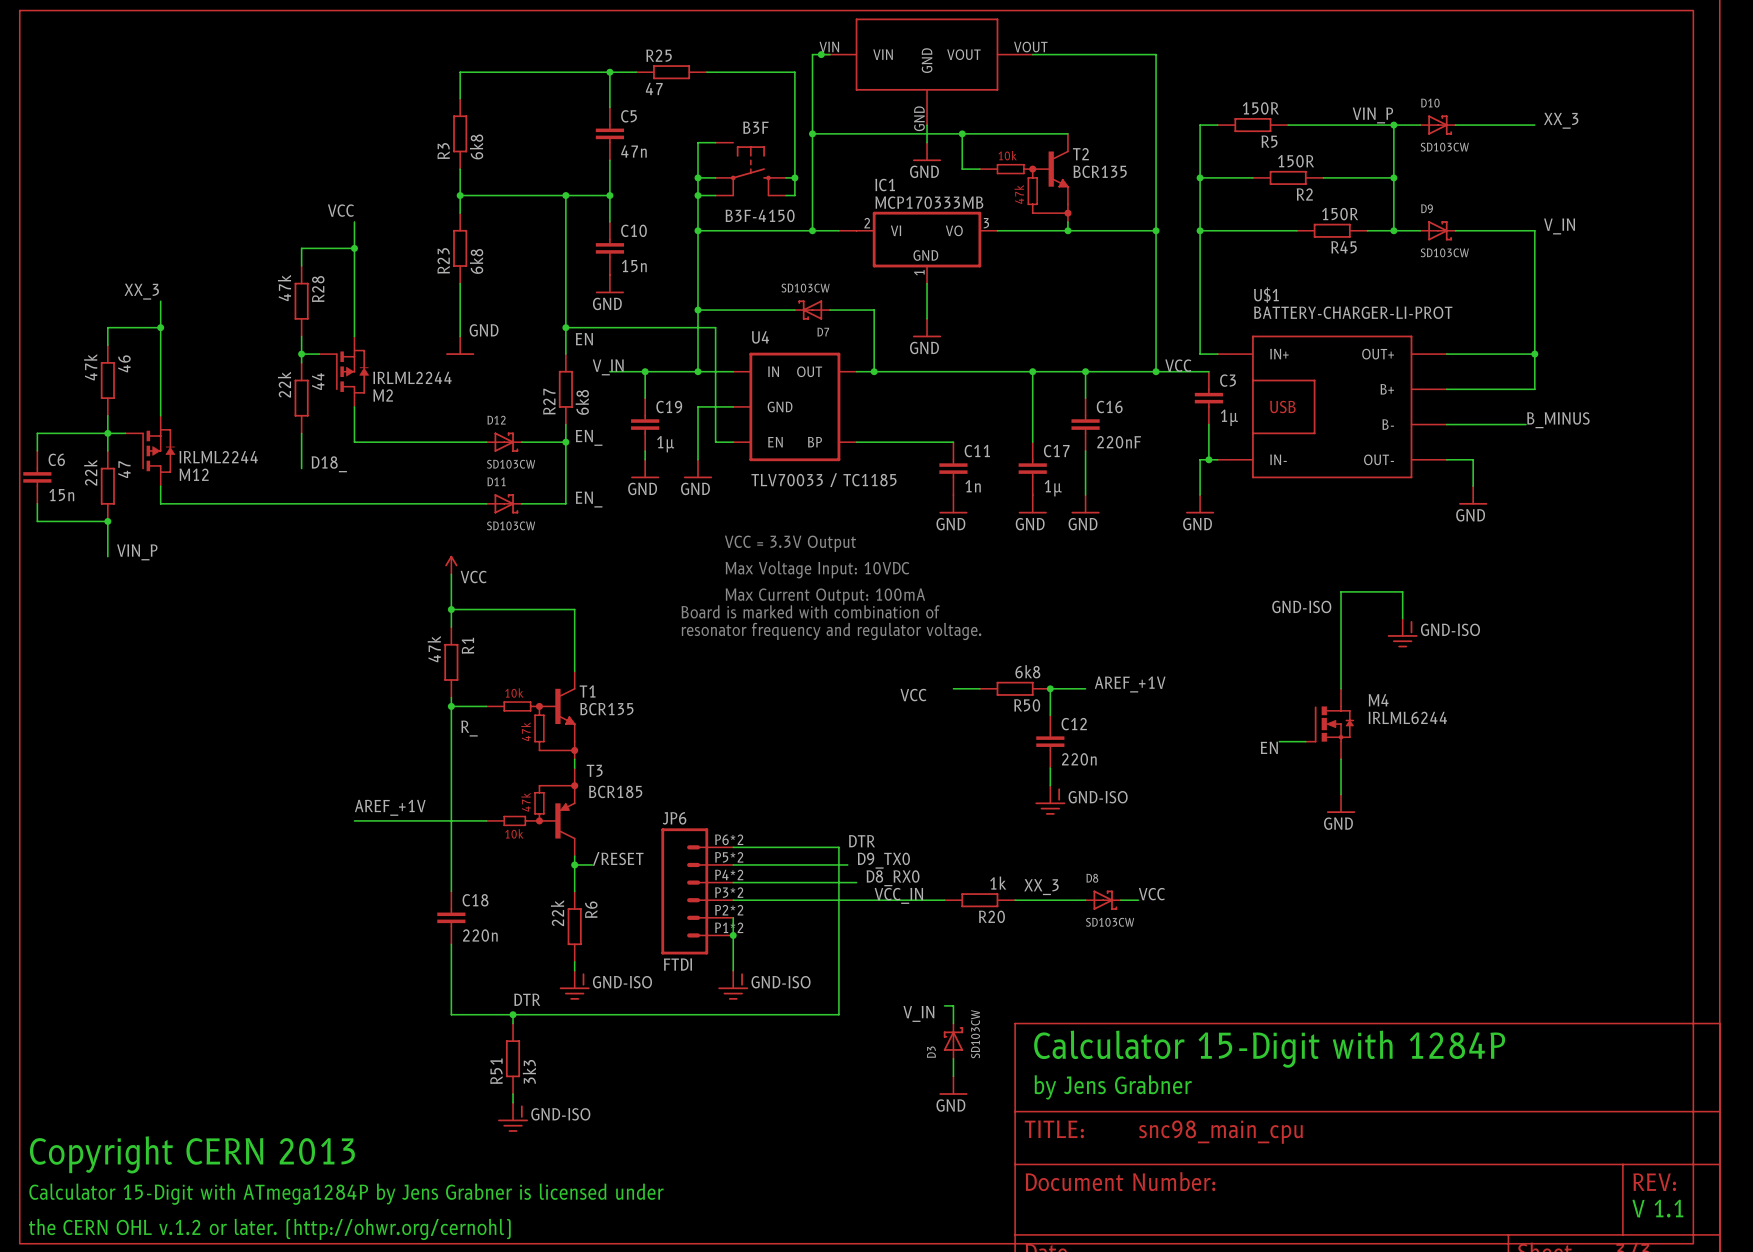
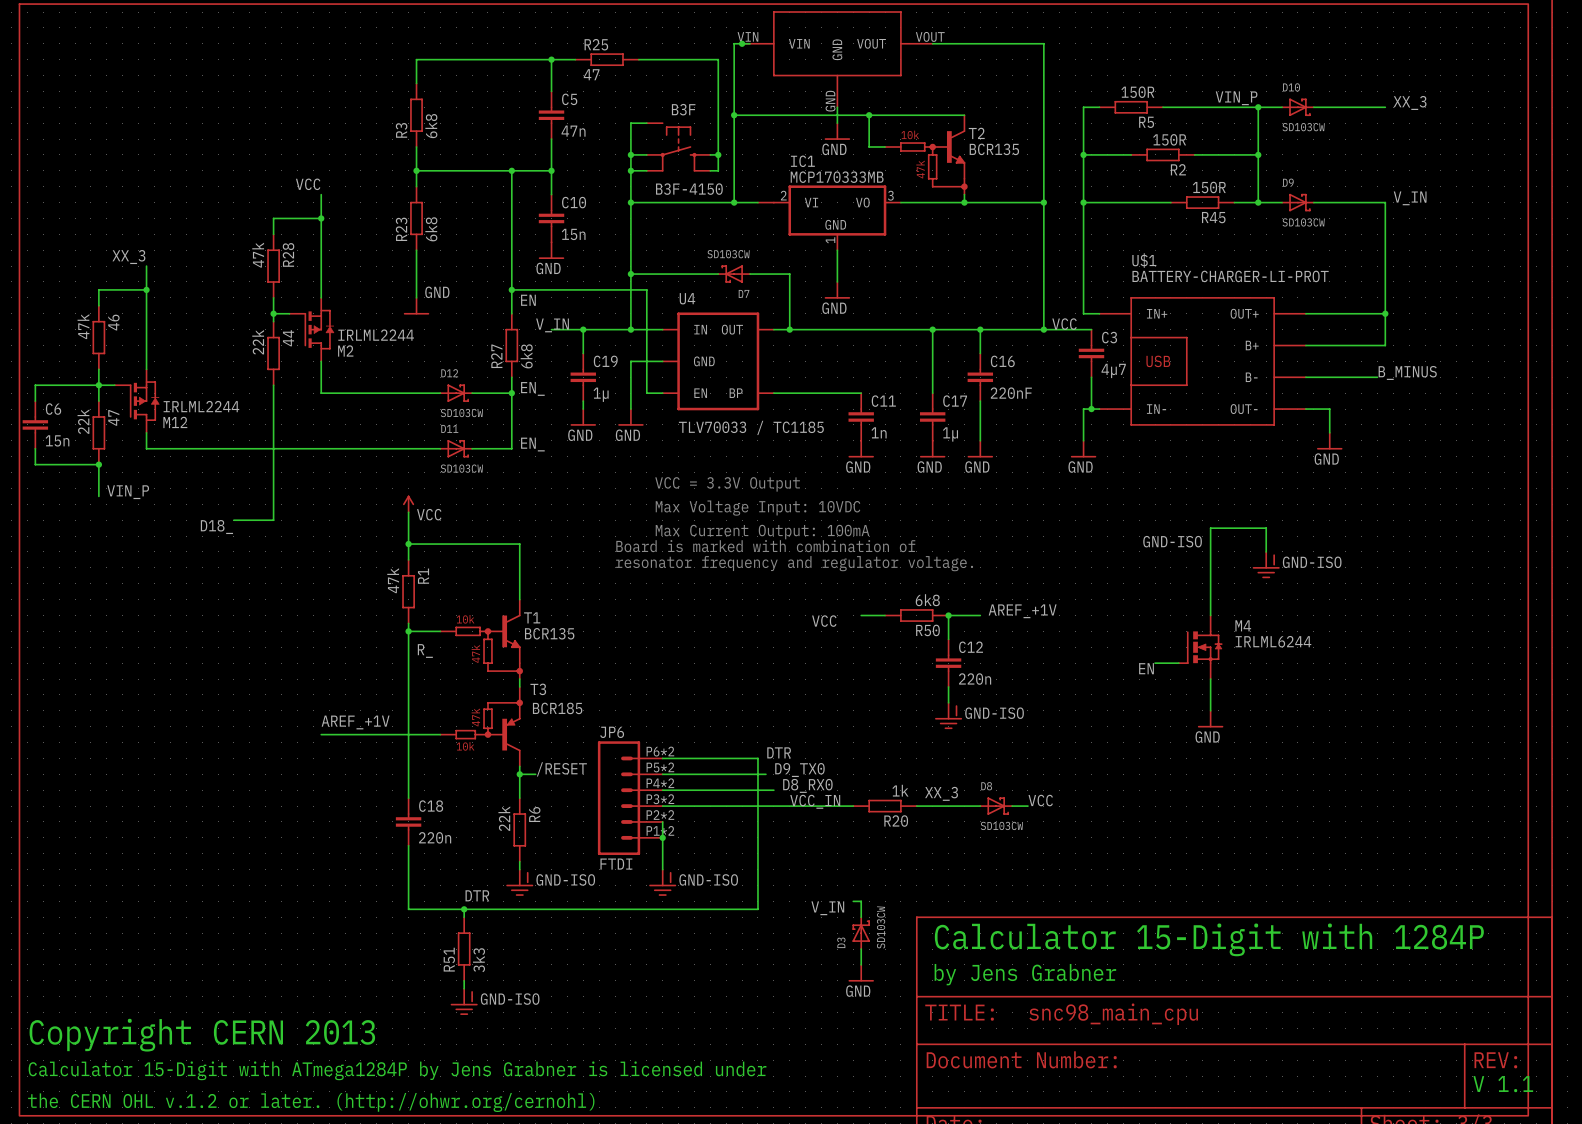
C3 value: 1µ (1229, 417) -> 4µ7 (1113, 370)
label position: D18_ (329, 464) -> D18_ (216, 527)
wire: none -> (273, 416) (273, 520) (233, 520)

